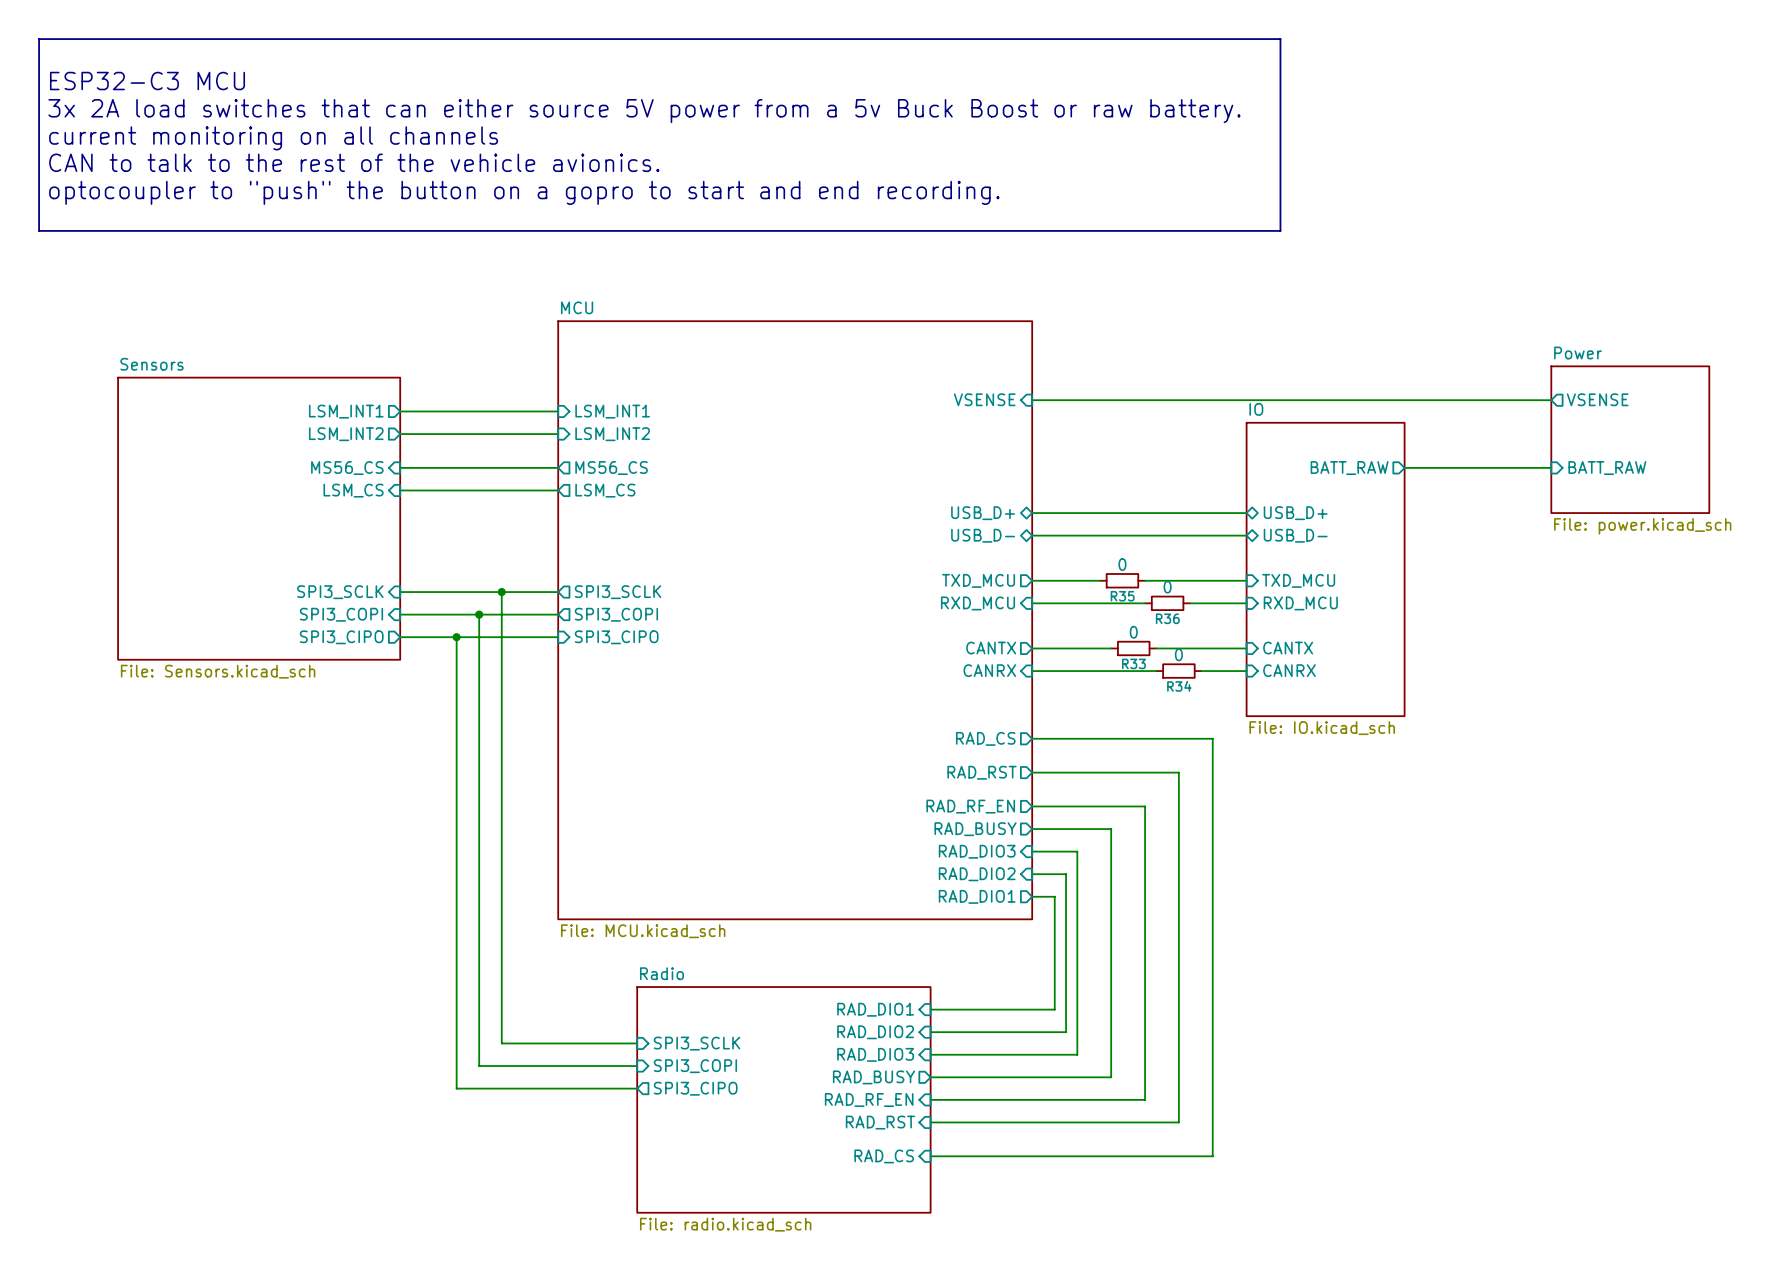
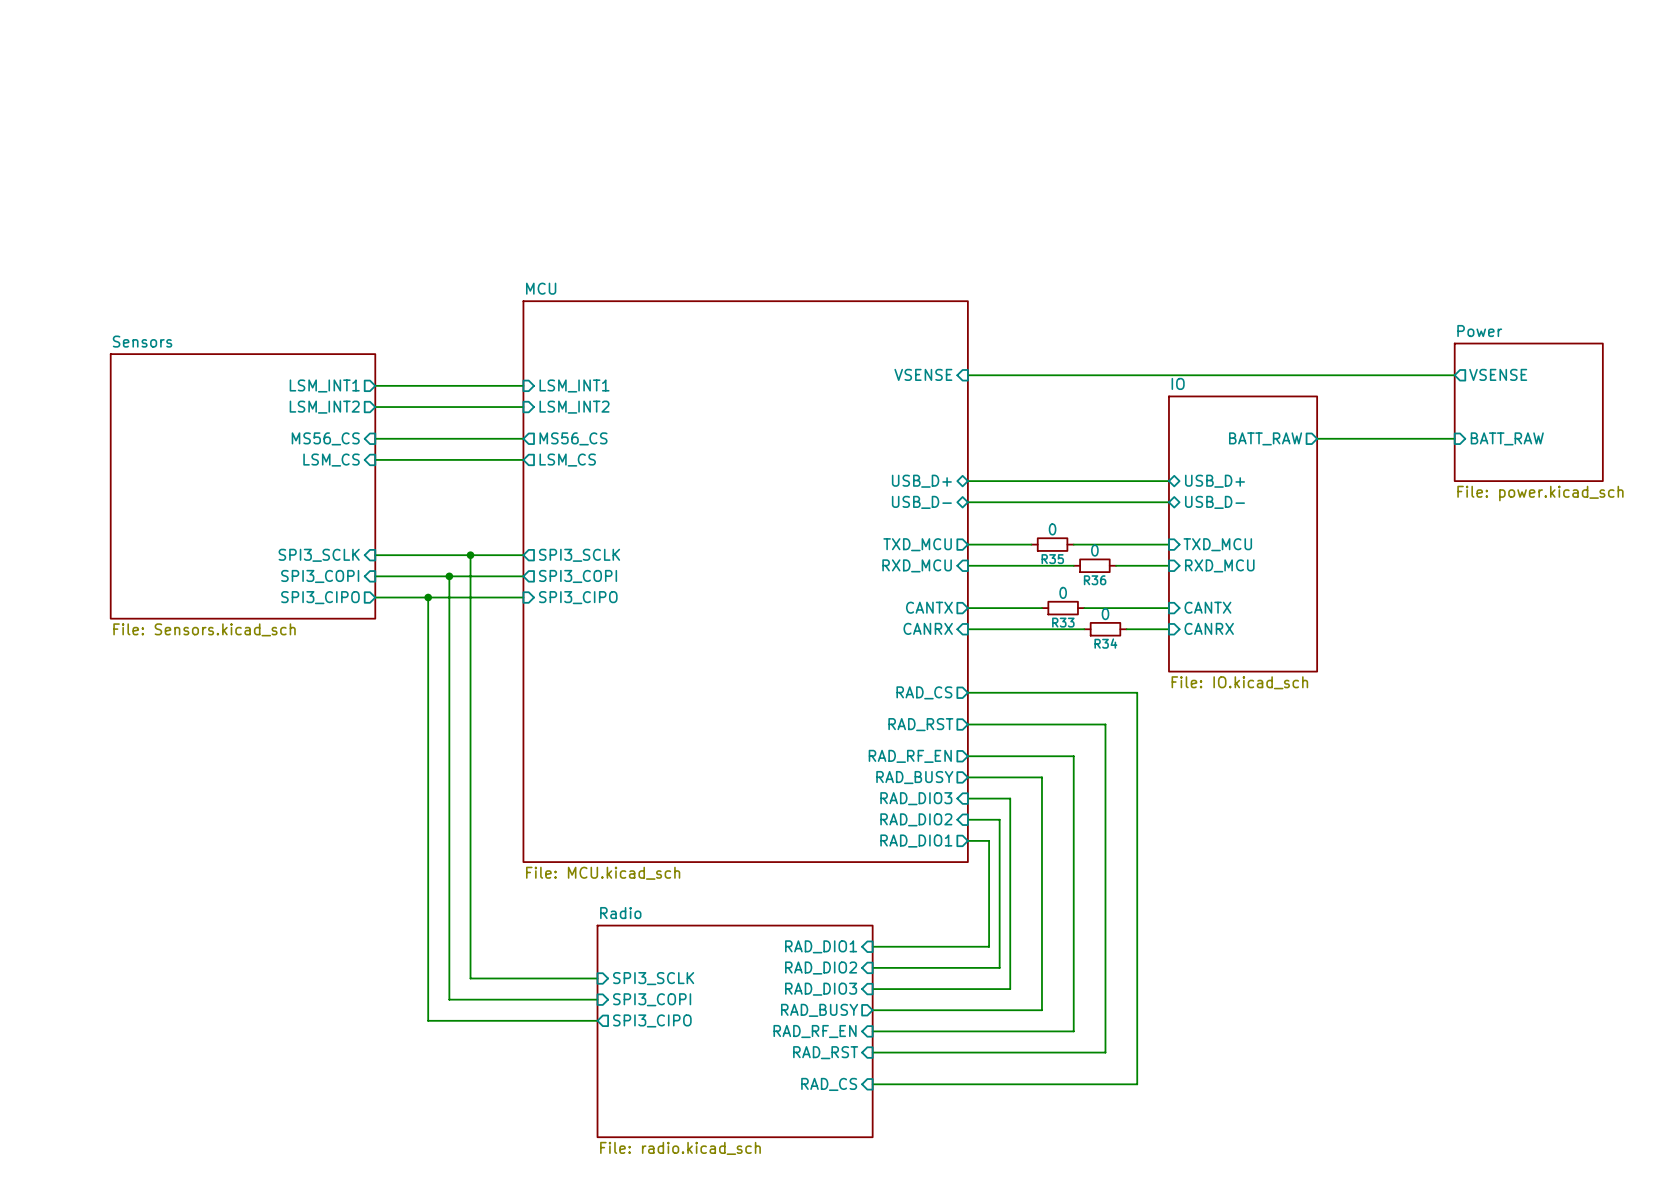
line: (39, 39) (1280, 39) (1280, 230) (39, 230) (39, 39) -> none
text: ESP32-C3 MCU (147, 81) -> none
text: 3x 2A load switches that can either source 5V power from a 5v Buck Boost or raw battery. (644, 111) -> none
text: current monitoring on all channels (273, 138) -> none
text: CAN to talk to the rest of the vehicle avionics. (354, 162) -> none
text: optocoupler to "push" the button on a gopro to start and end recording. (524, 192) -> none

